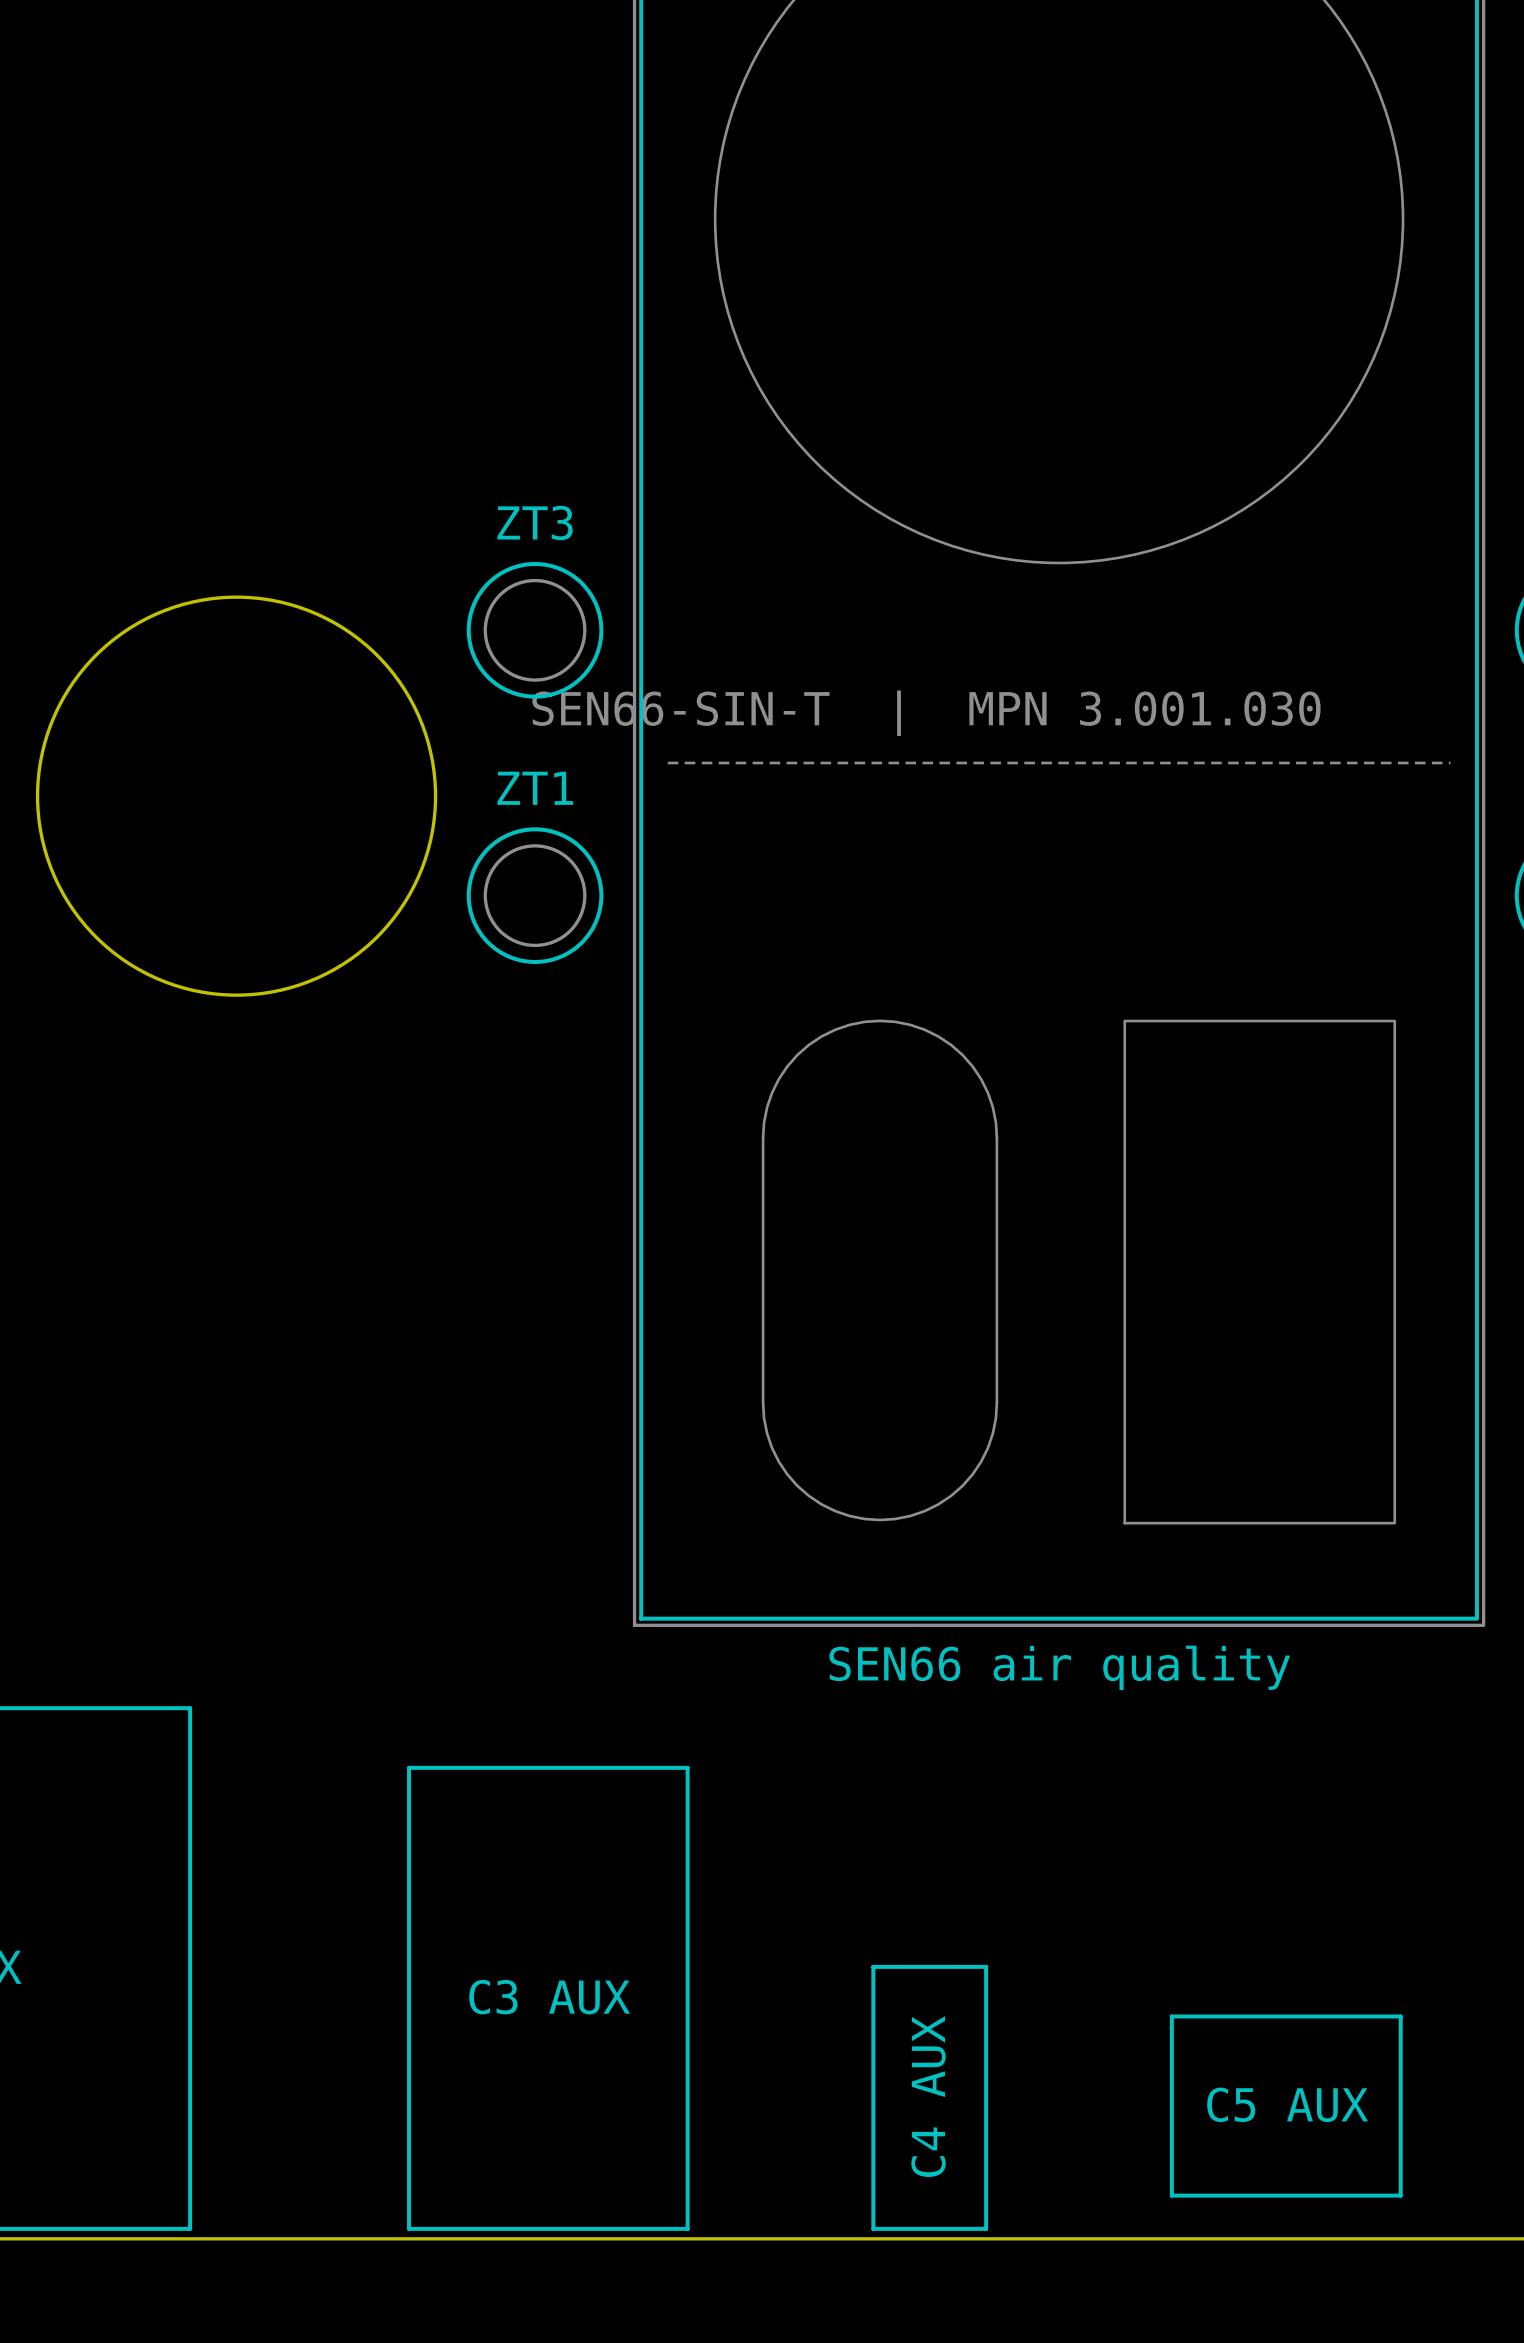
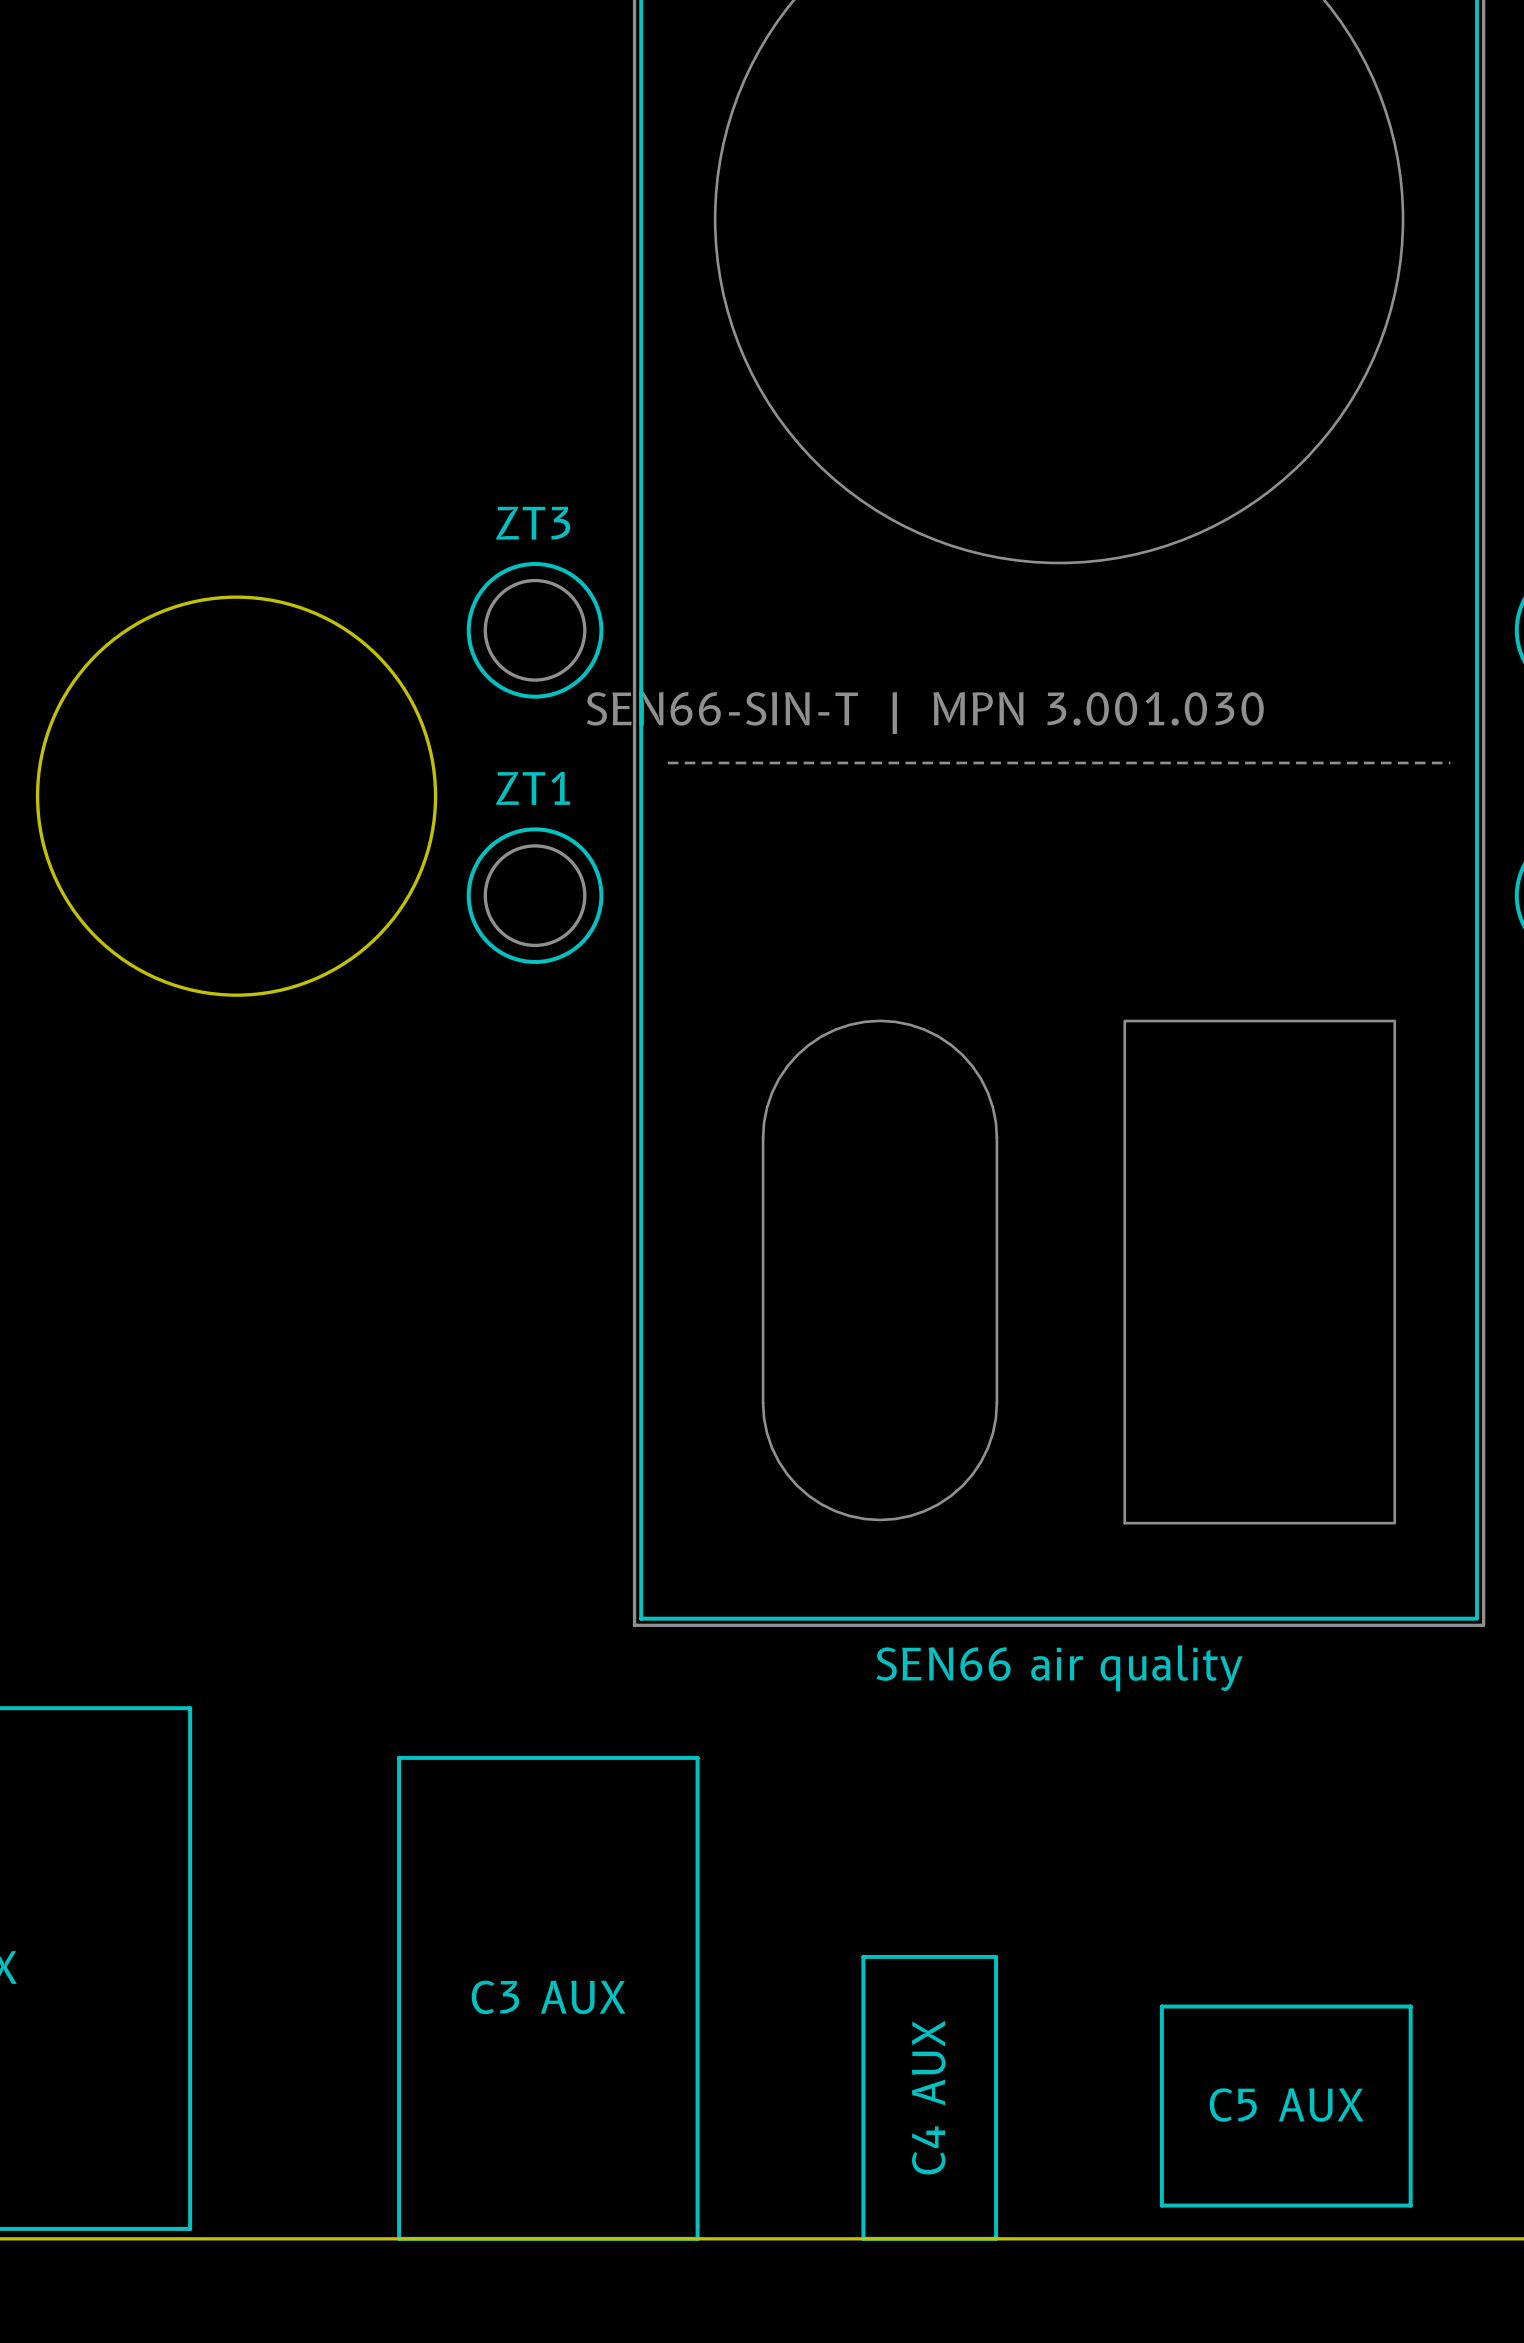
line: (409, 1767) (687, 1767) (687, 2228) (409, 2228) (409, 1767) -> (399, 1757) (399, 2238) (697, 2238) (697, 1757) (399, 1757)
line: (873, 1966) (986, 1966) (986, 2228) (873, 2228) (873, 1966) -> (863, 1956) (863, 2238) (996, 2238) (996, 1956) (863, 1956)
line: (1171, 2016) (1400, 2016) (1400, 2195) (1171, 2195) (1171, 2016) -> (1161, 2006) (1161, 2205) (1410, 2205) (1410, 2006) (1161, 2006)

